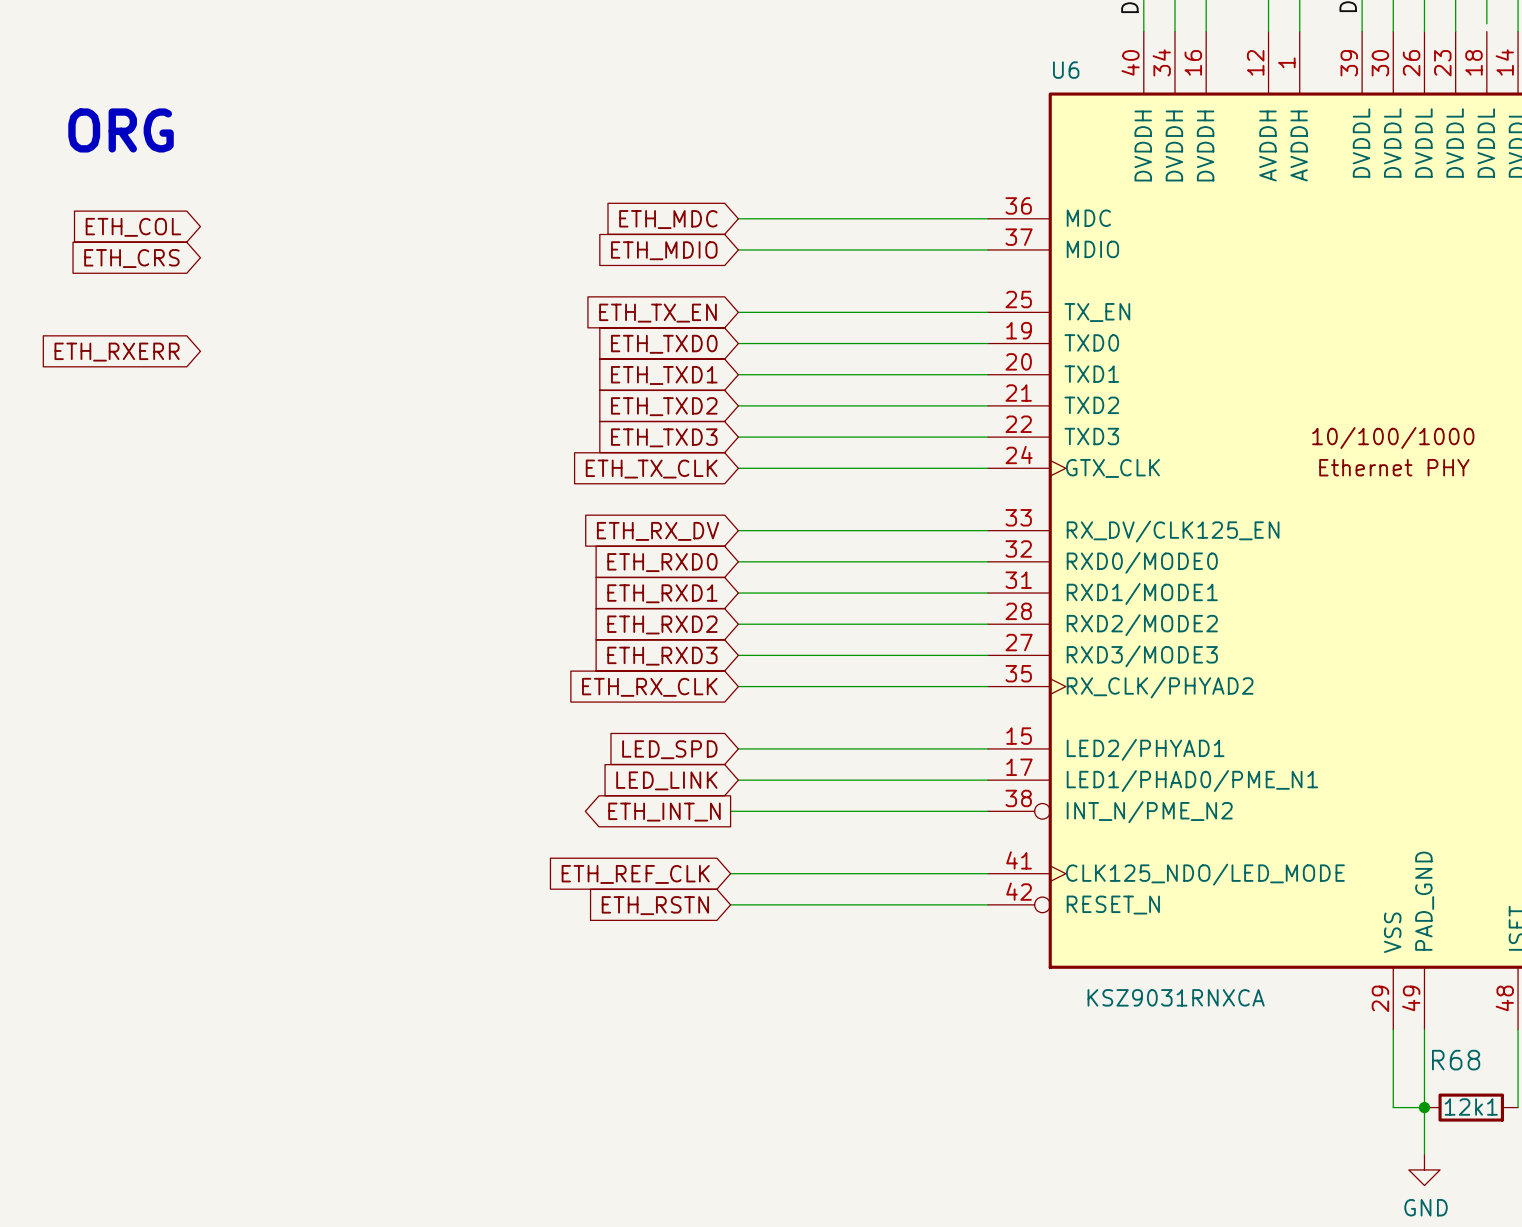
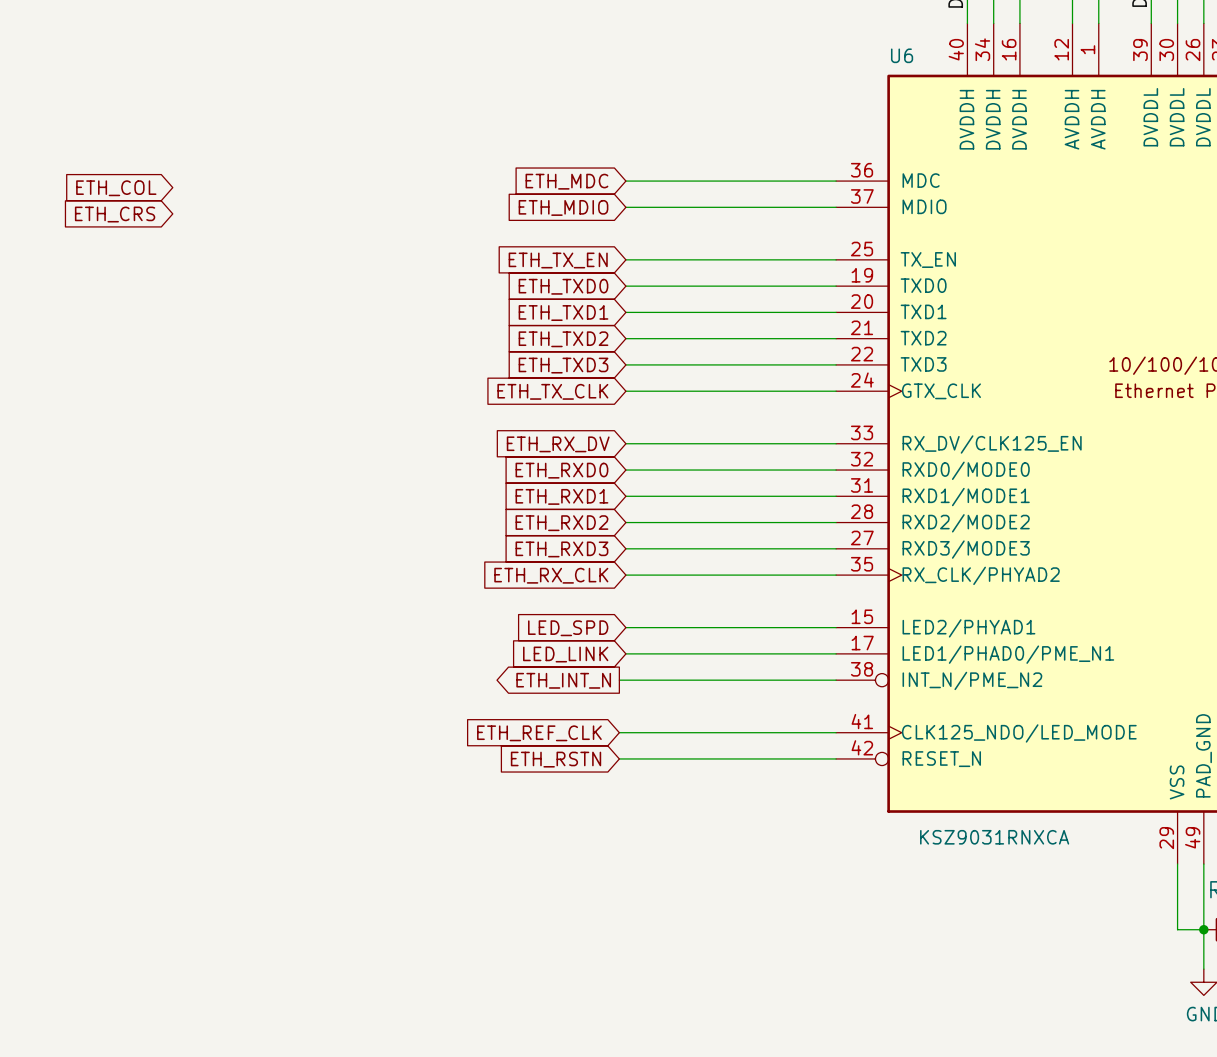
text: ORG (121, 130) -> none
global label: ETH_RXERR (117, 352) -> none

